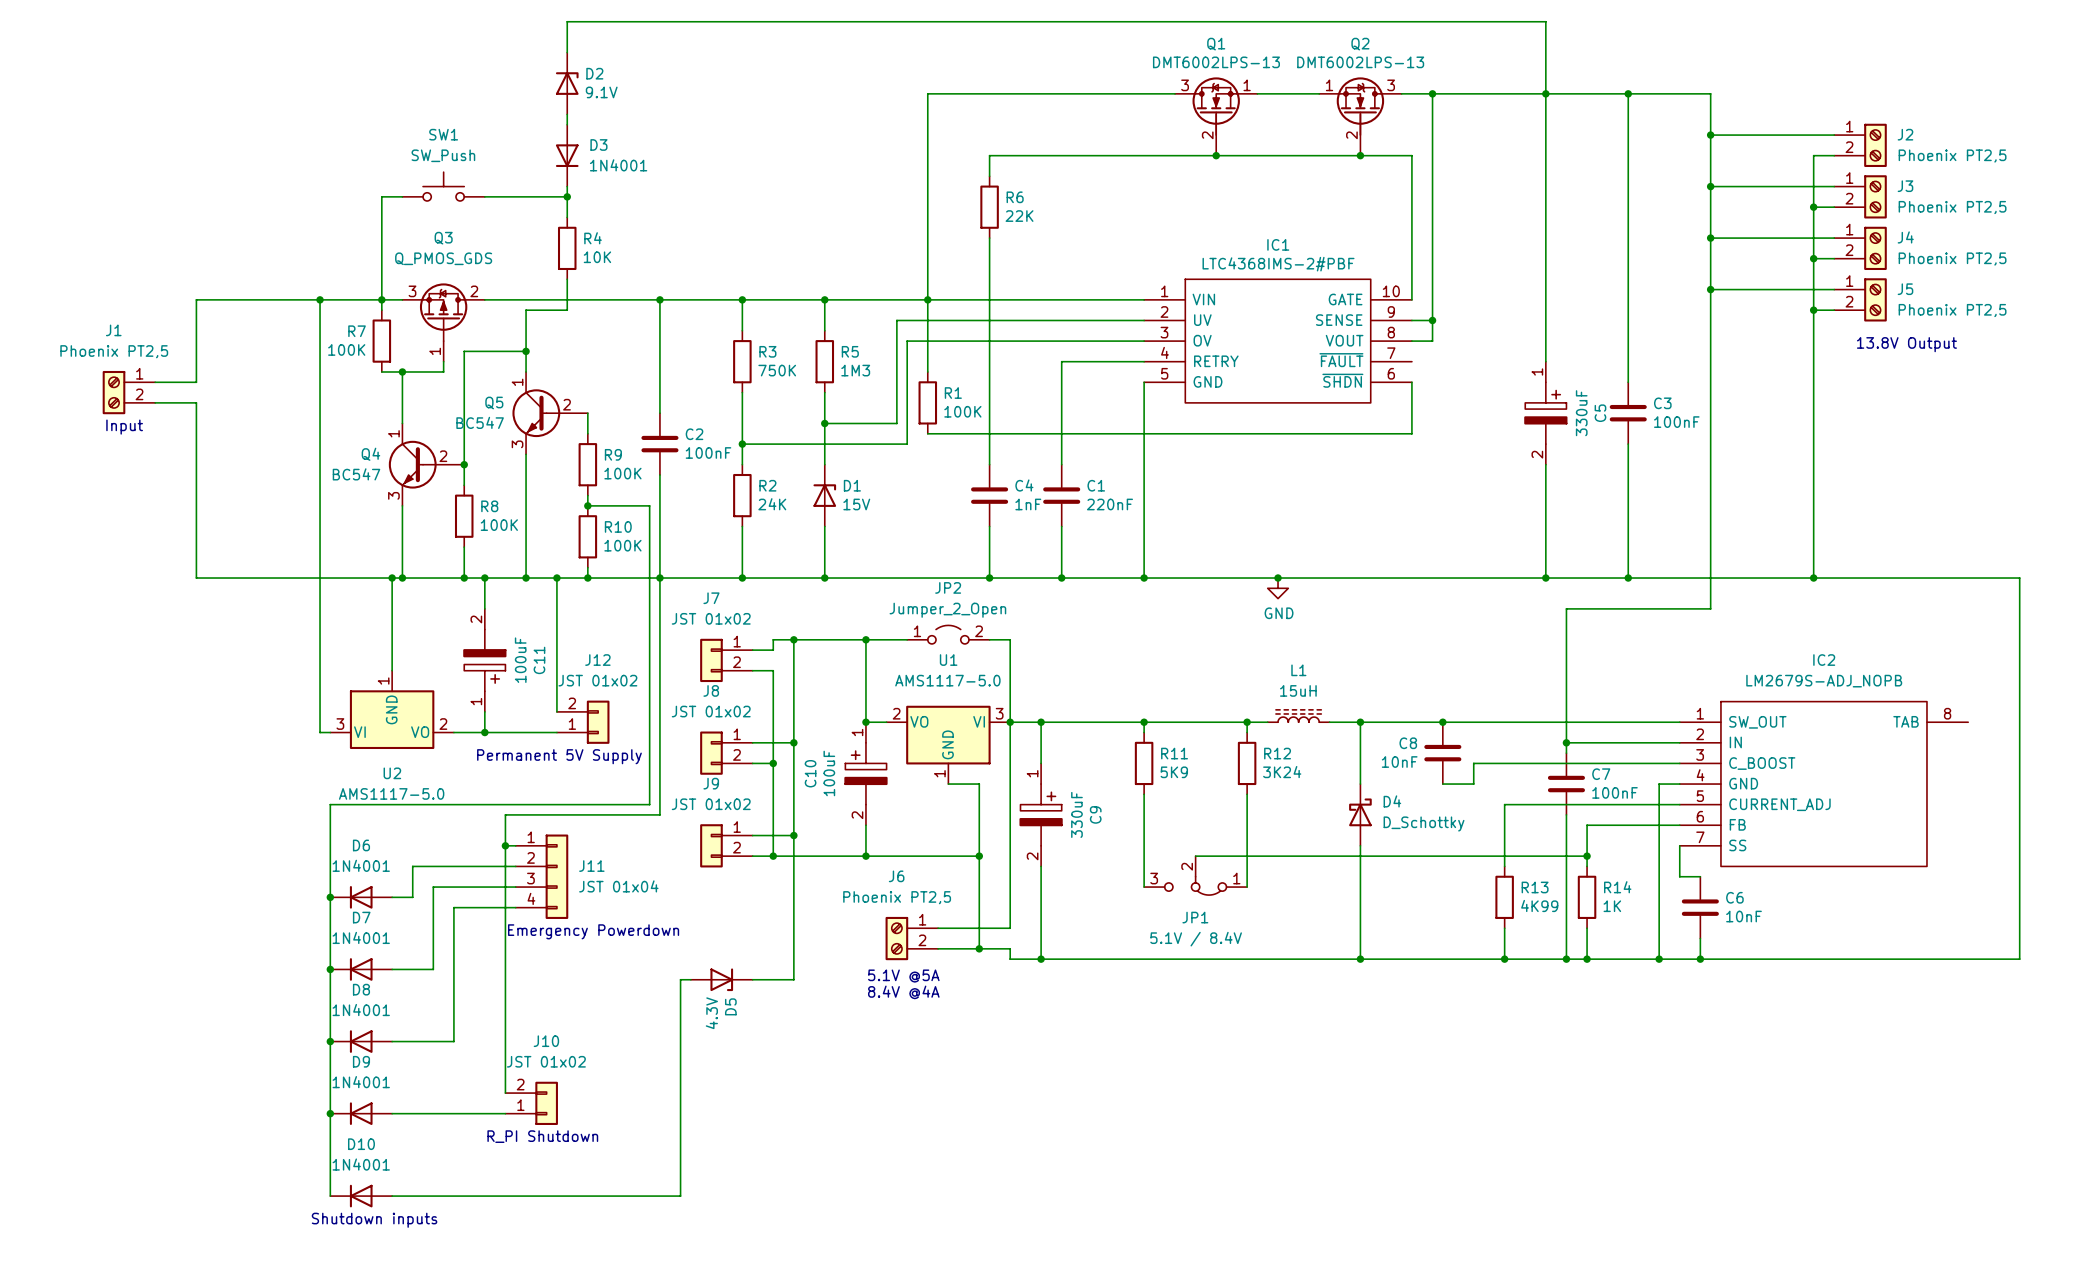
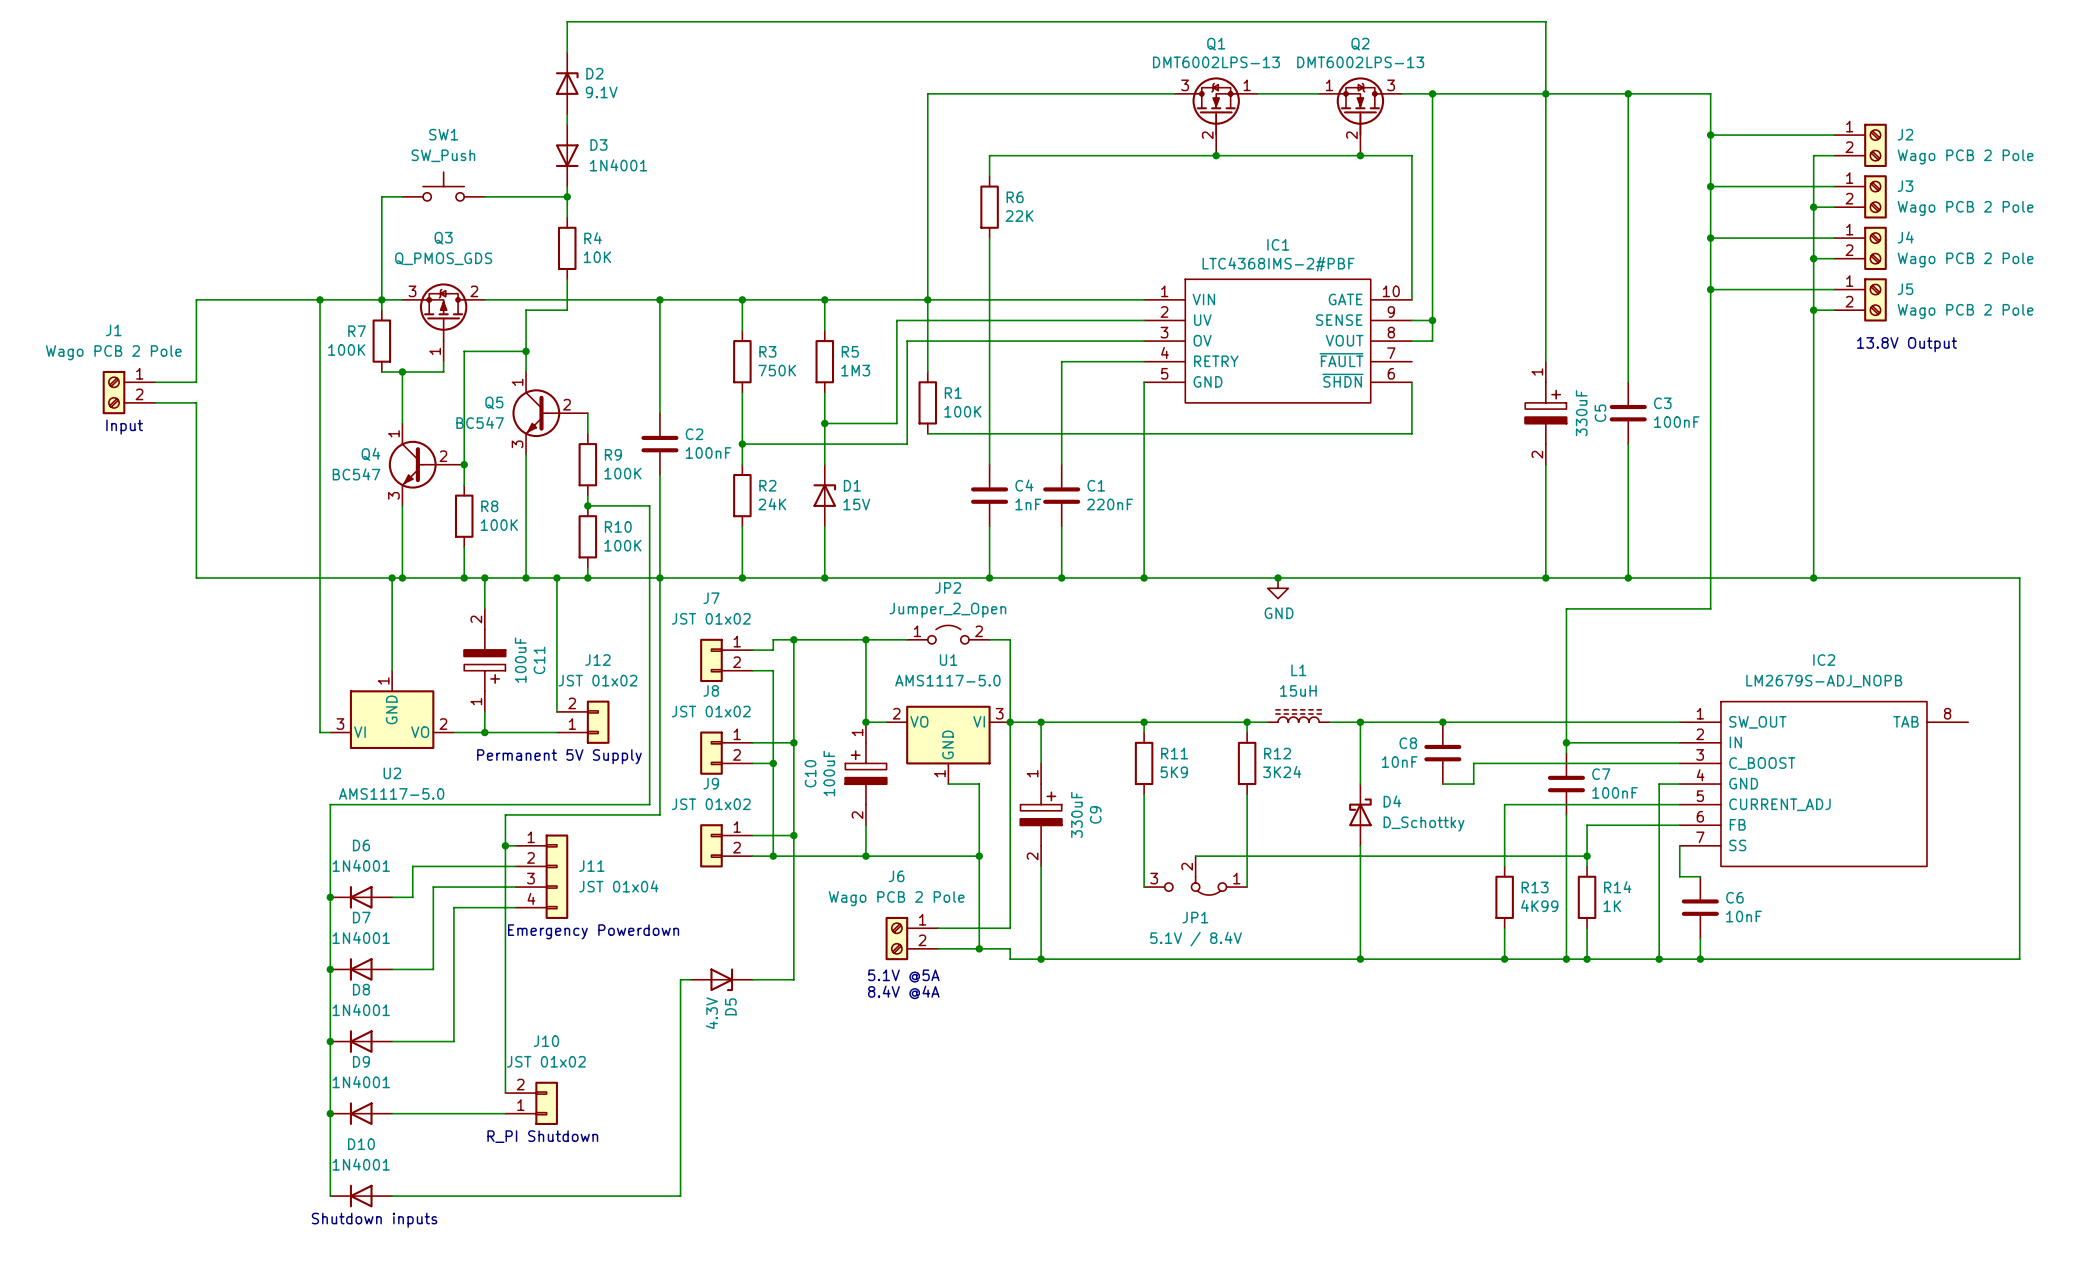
J2 value: Phoenix PT2,5 (1952, 156) -> Wago PCB 2 Pole (1965, 157)
J3 value: Phoenix PT2,5 (1952, 207) -> Wago PCB 2 Pole (1965, 208)
J4 value: Phoenix PT2,5 (1952, 259) -> Wago PCB 2 Pole (1965, 260)
J5 value: Phoenix PT2,5 (1952, 310) -> Wago PCB 2 Pole (1965, 311)
J1 value: Phoenix PT2,5 (114, 351) -> Wago PCB 2 Pole (113, 352)
J6 value: Phoenix PT2,5 (897, 897) -> Wago PCB 2 Pole (896, 898)

